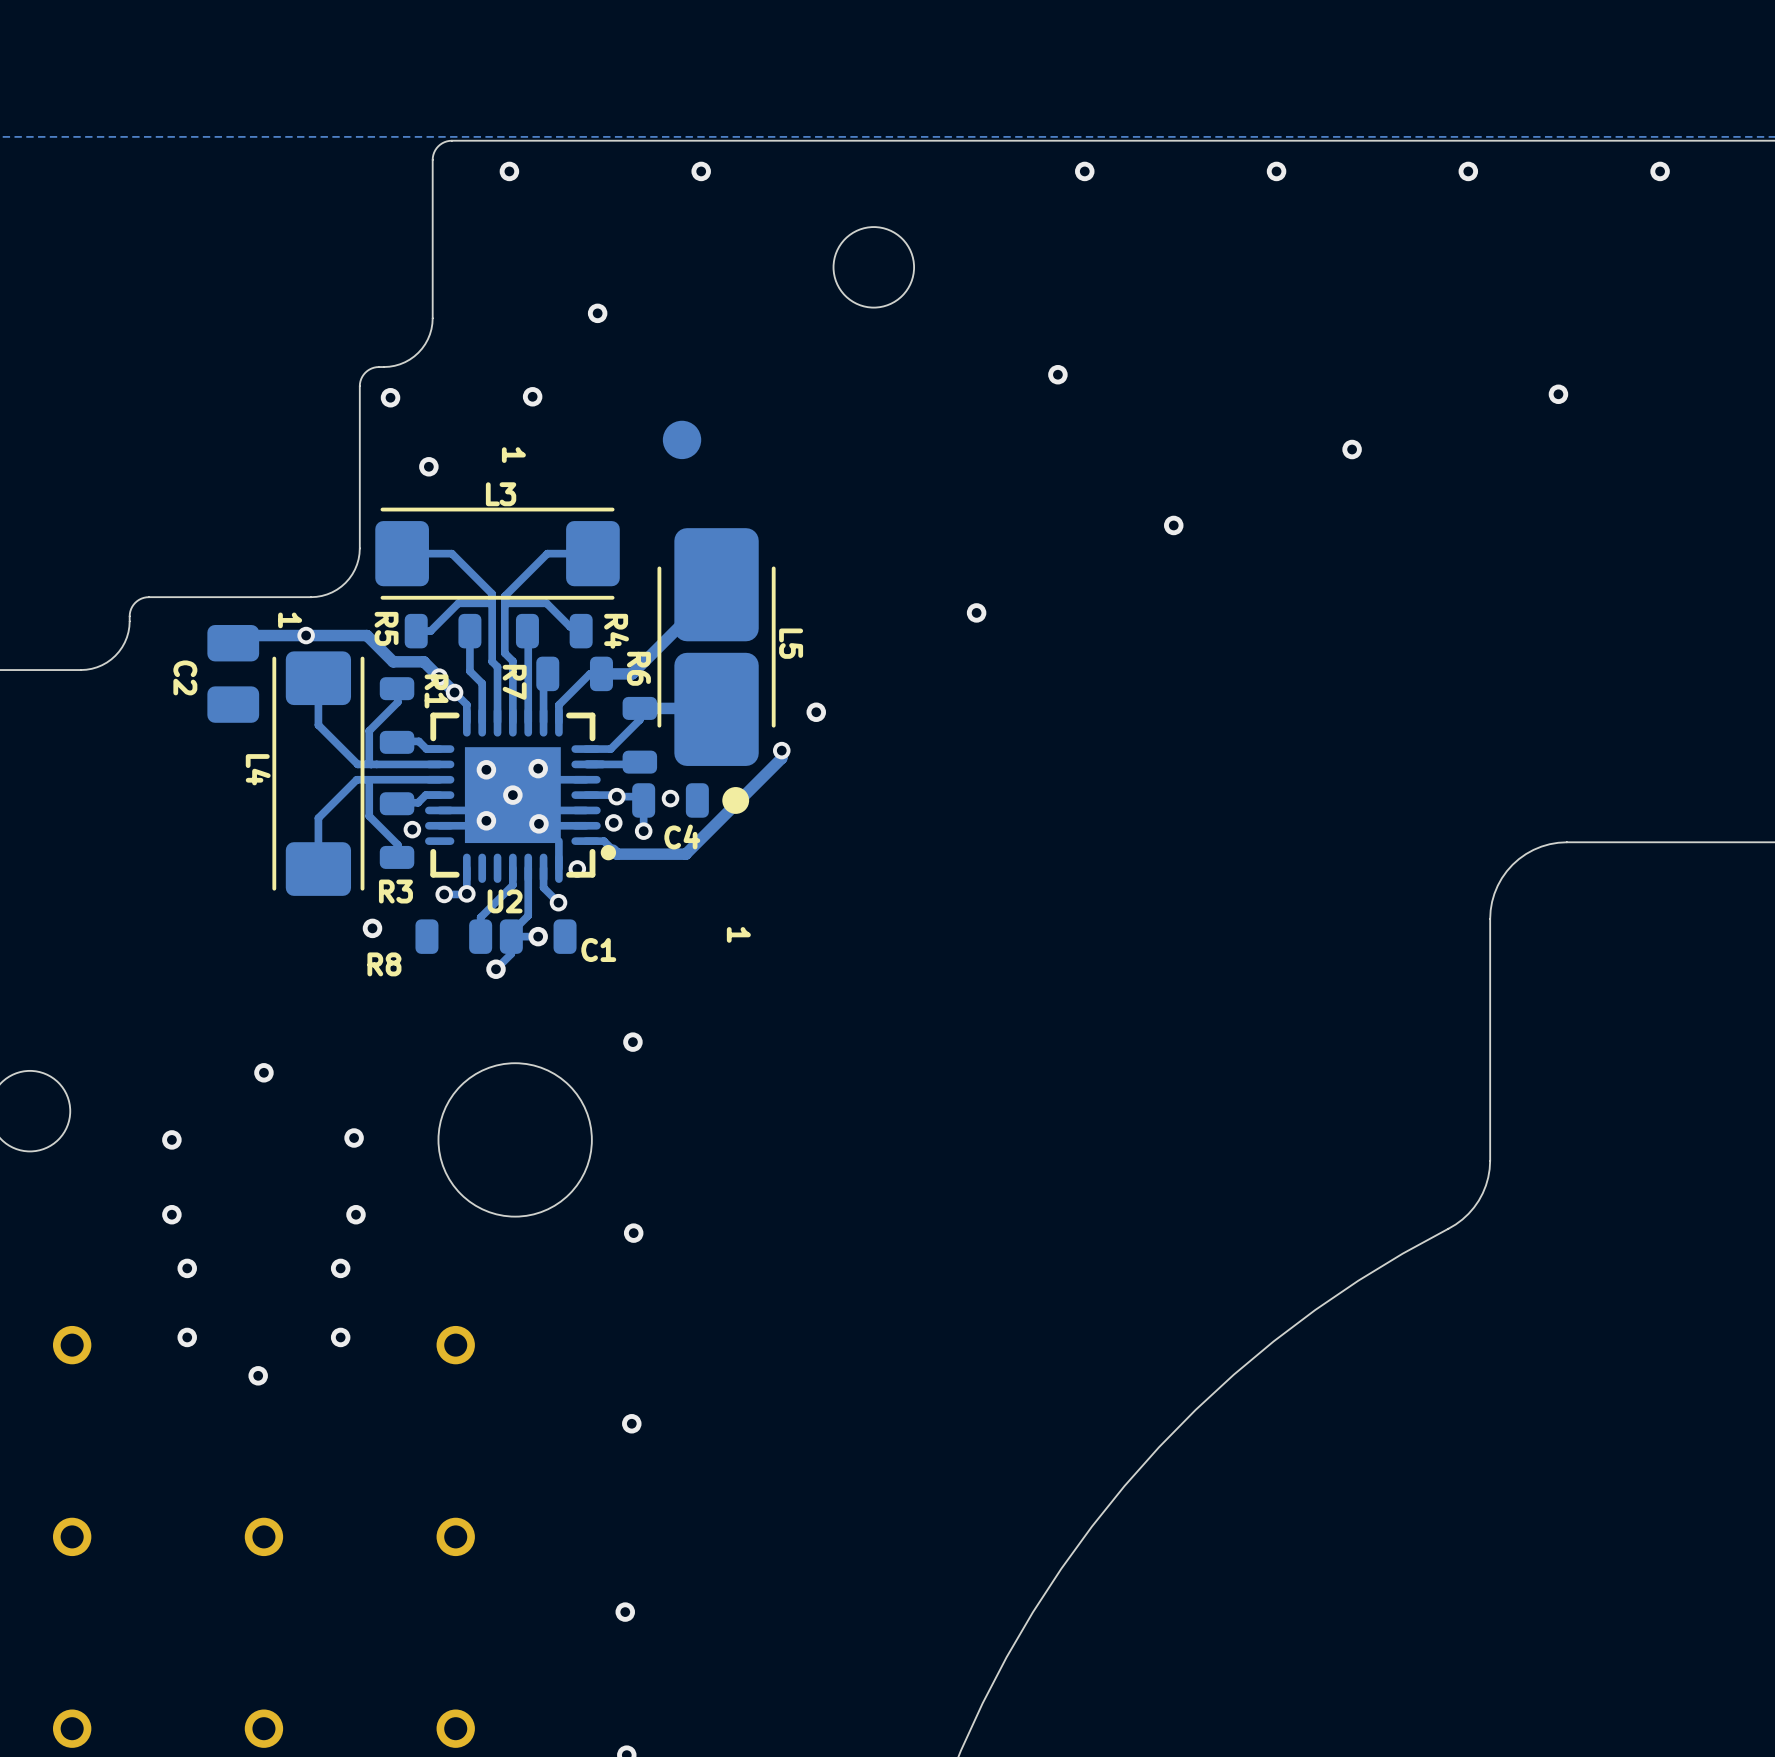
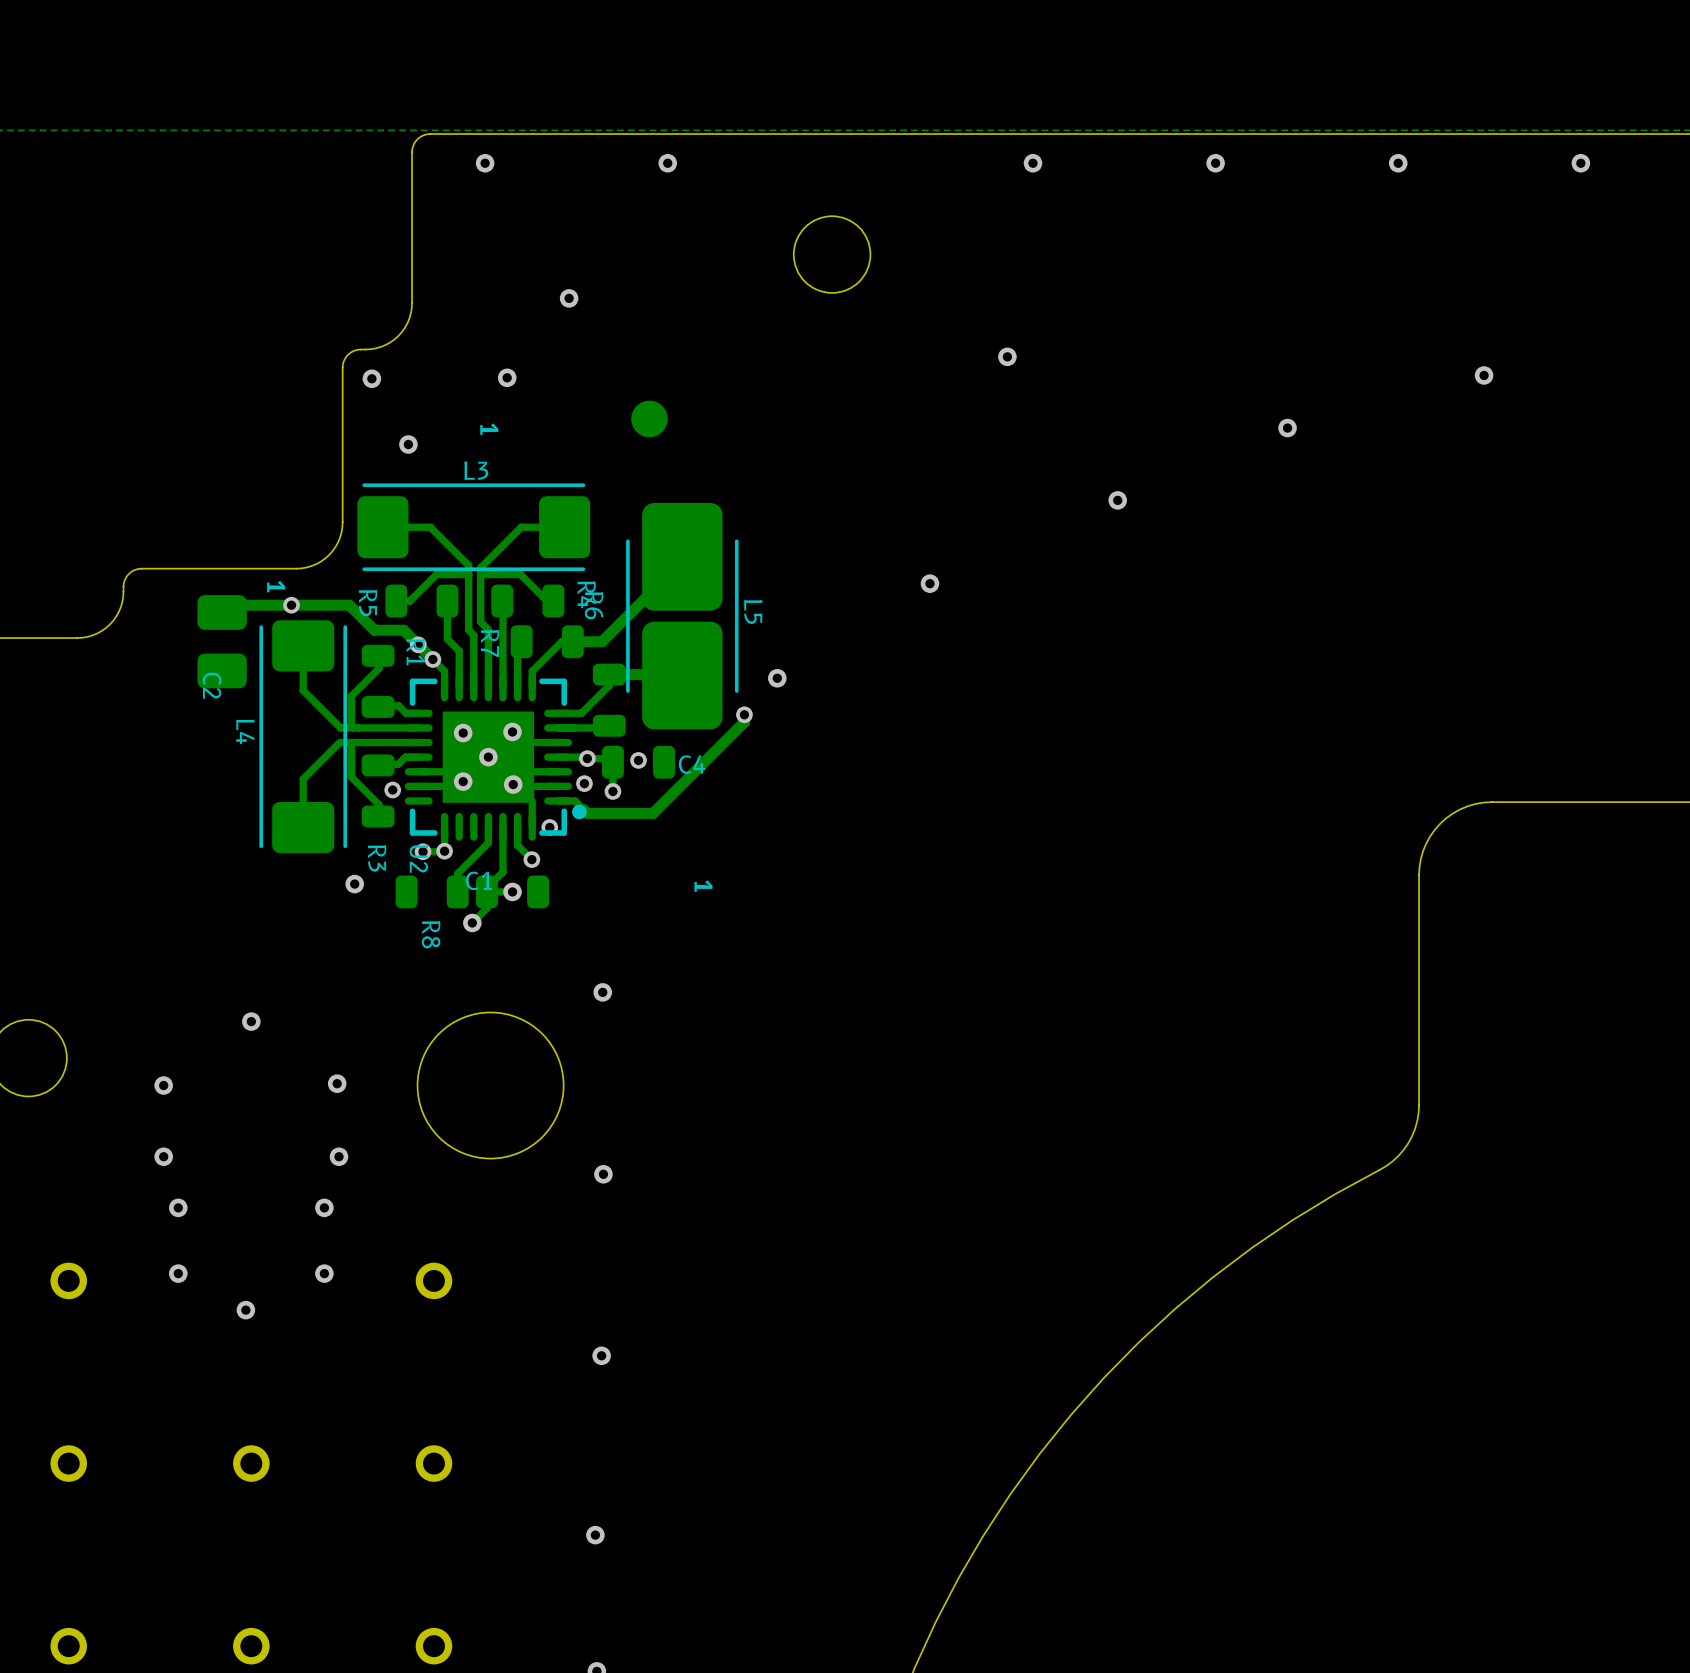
L5 footprint: [657, 528, 776, 814] -> [626, 502, 739, 730]
R6 name position: R6 (638, 668) -> R6 (594, 605)
C2 name position: C2 (185, 677) -> C2 (212, 685)
C4 name position: C4 (682, 836) -> C4 (692, 764)
R3 name rotation: 0° (395, 891) -> 90° clockwise (377, 858)
U2 name rotation: 0° (505, 901) -> 90° clockwise (418, 858)
U2 name position: U2 (505, 901) -> U2 (418, 858)
C1 name position: C1 (598, 950) -> C1 (478, 880)
R8 name rotation: 0° (384, 964) -> 90° clockwise (431, 934)
R8 name position: R8 (384, 964) -> R8 (431, 934)

